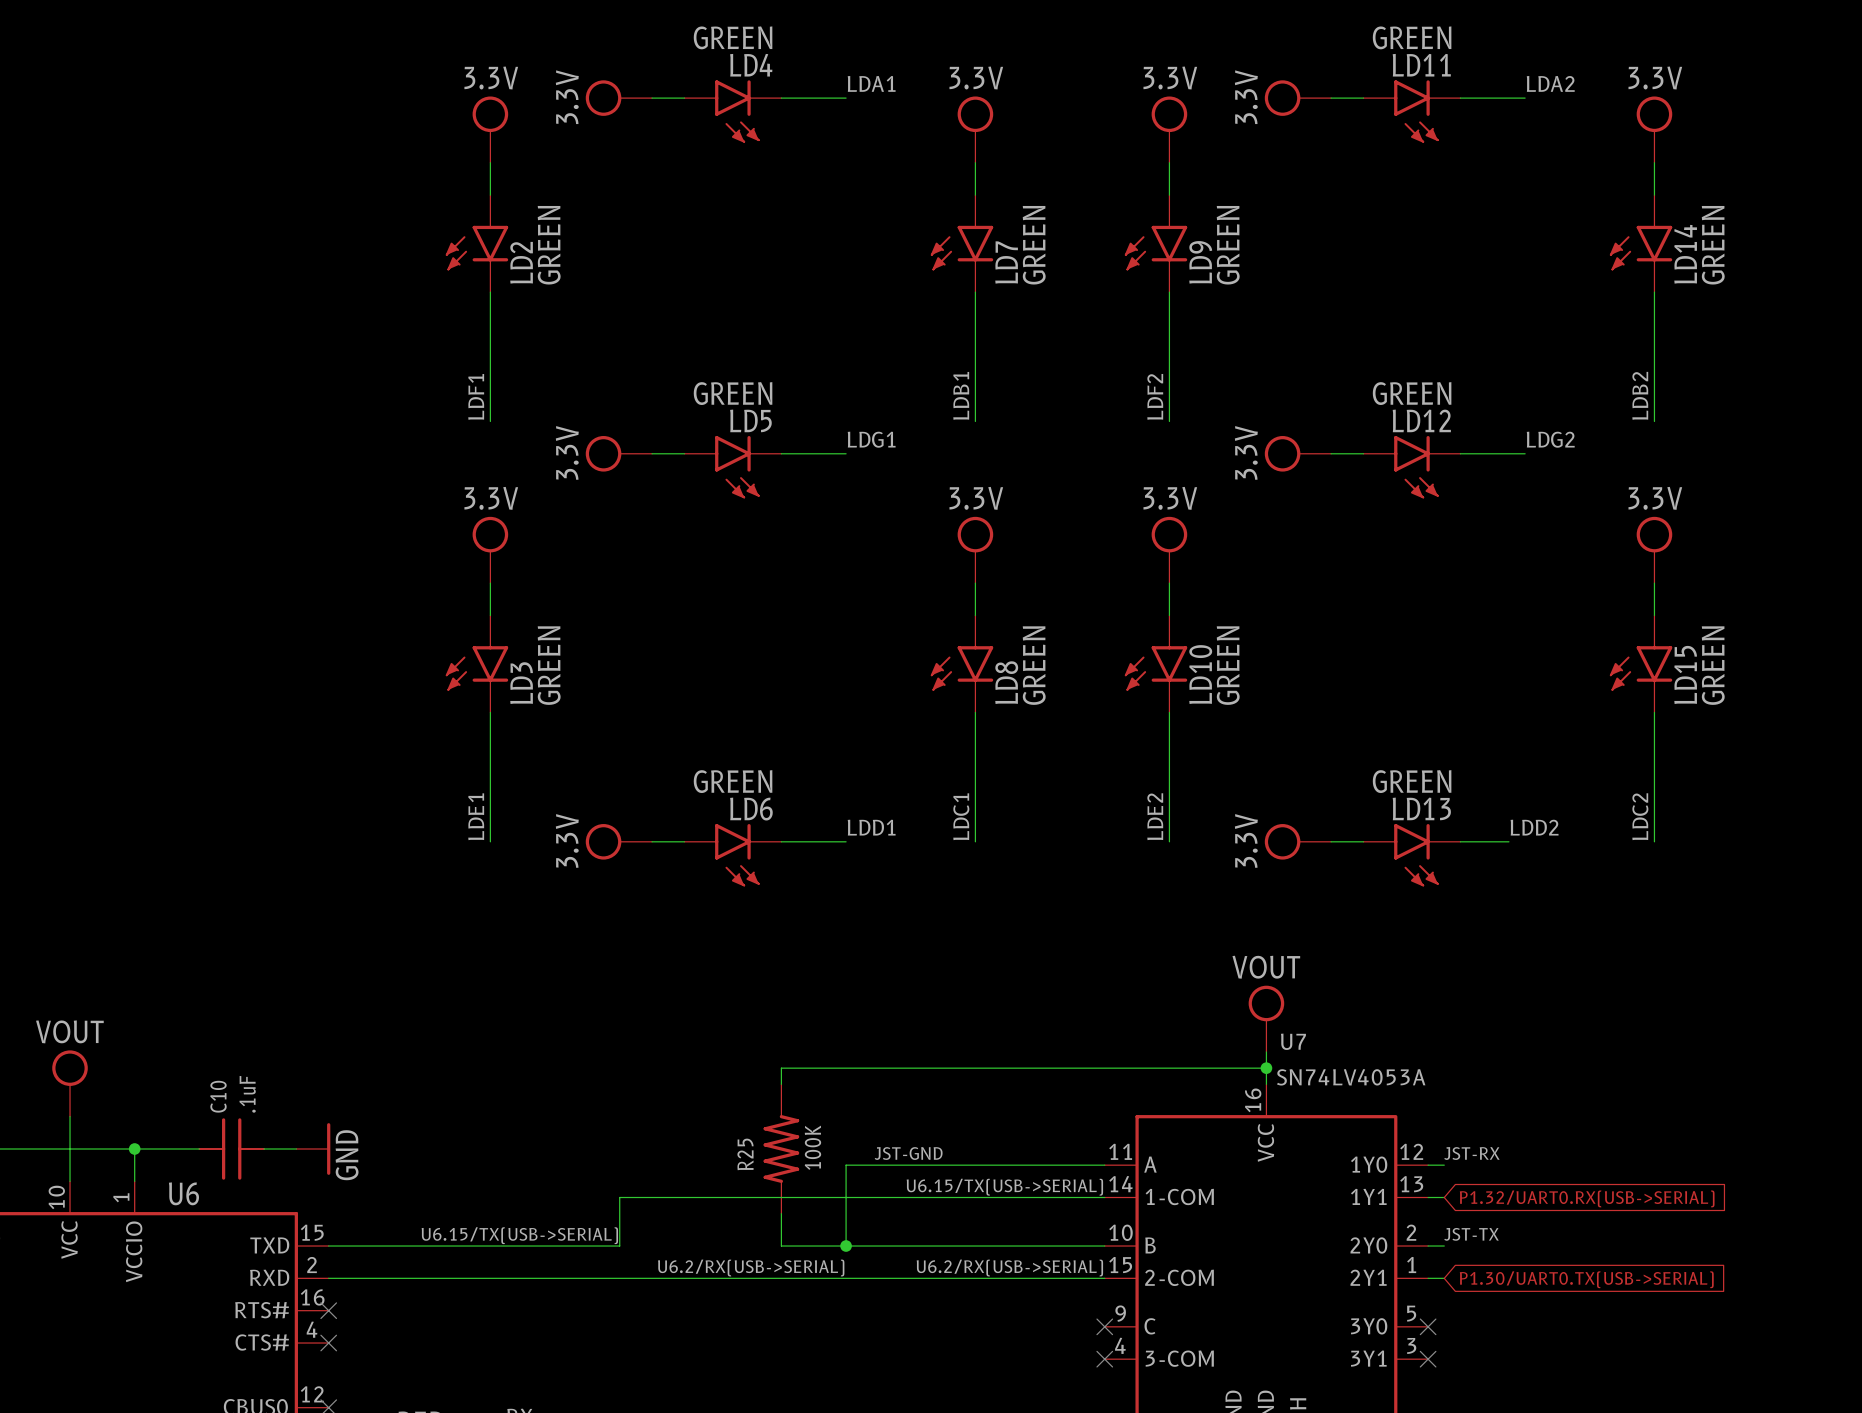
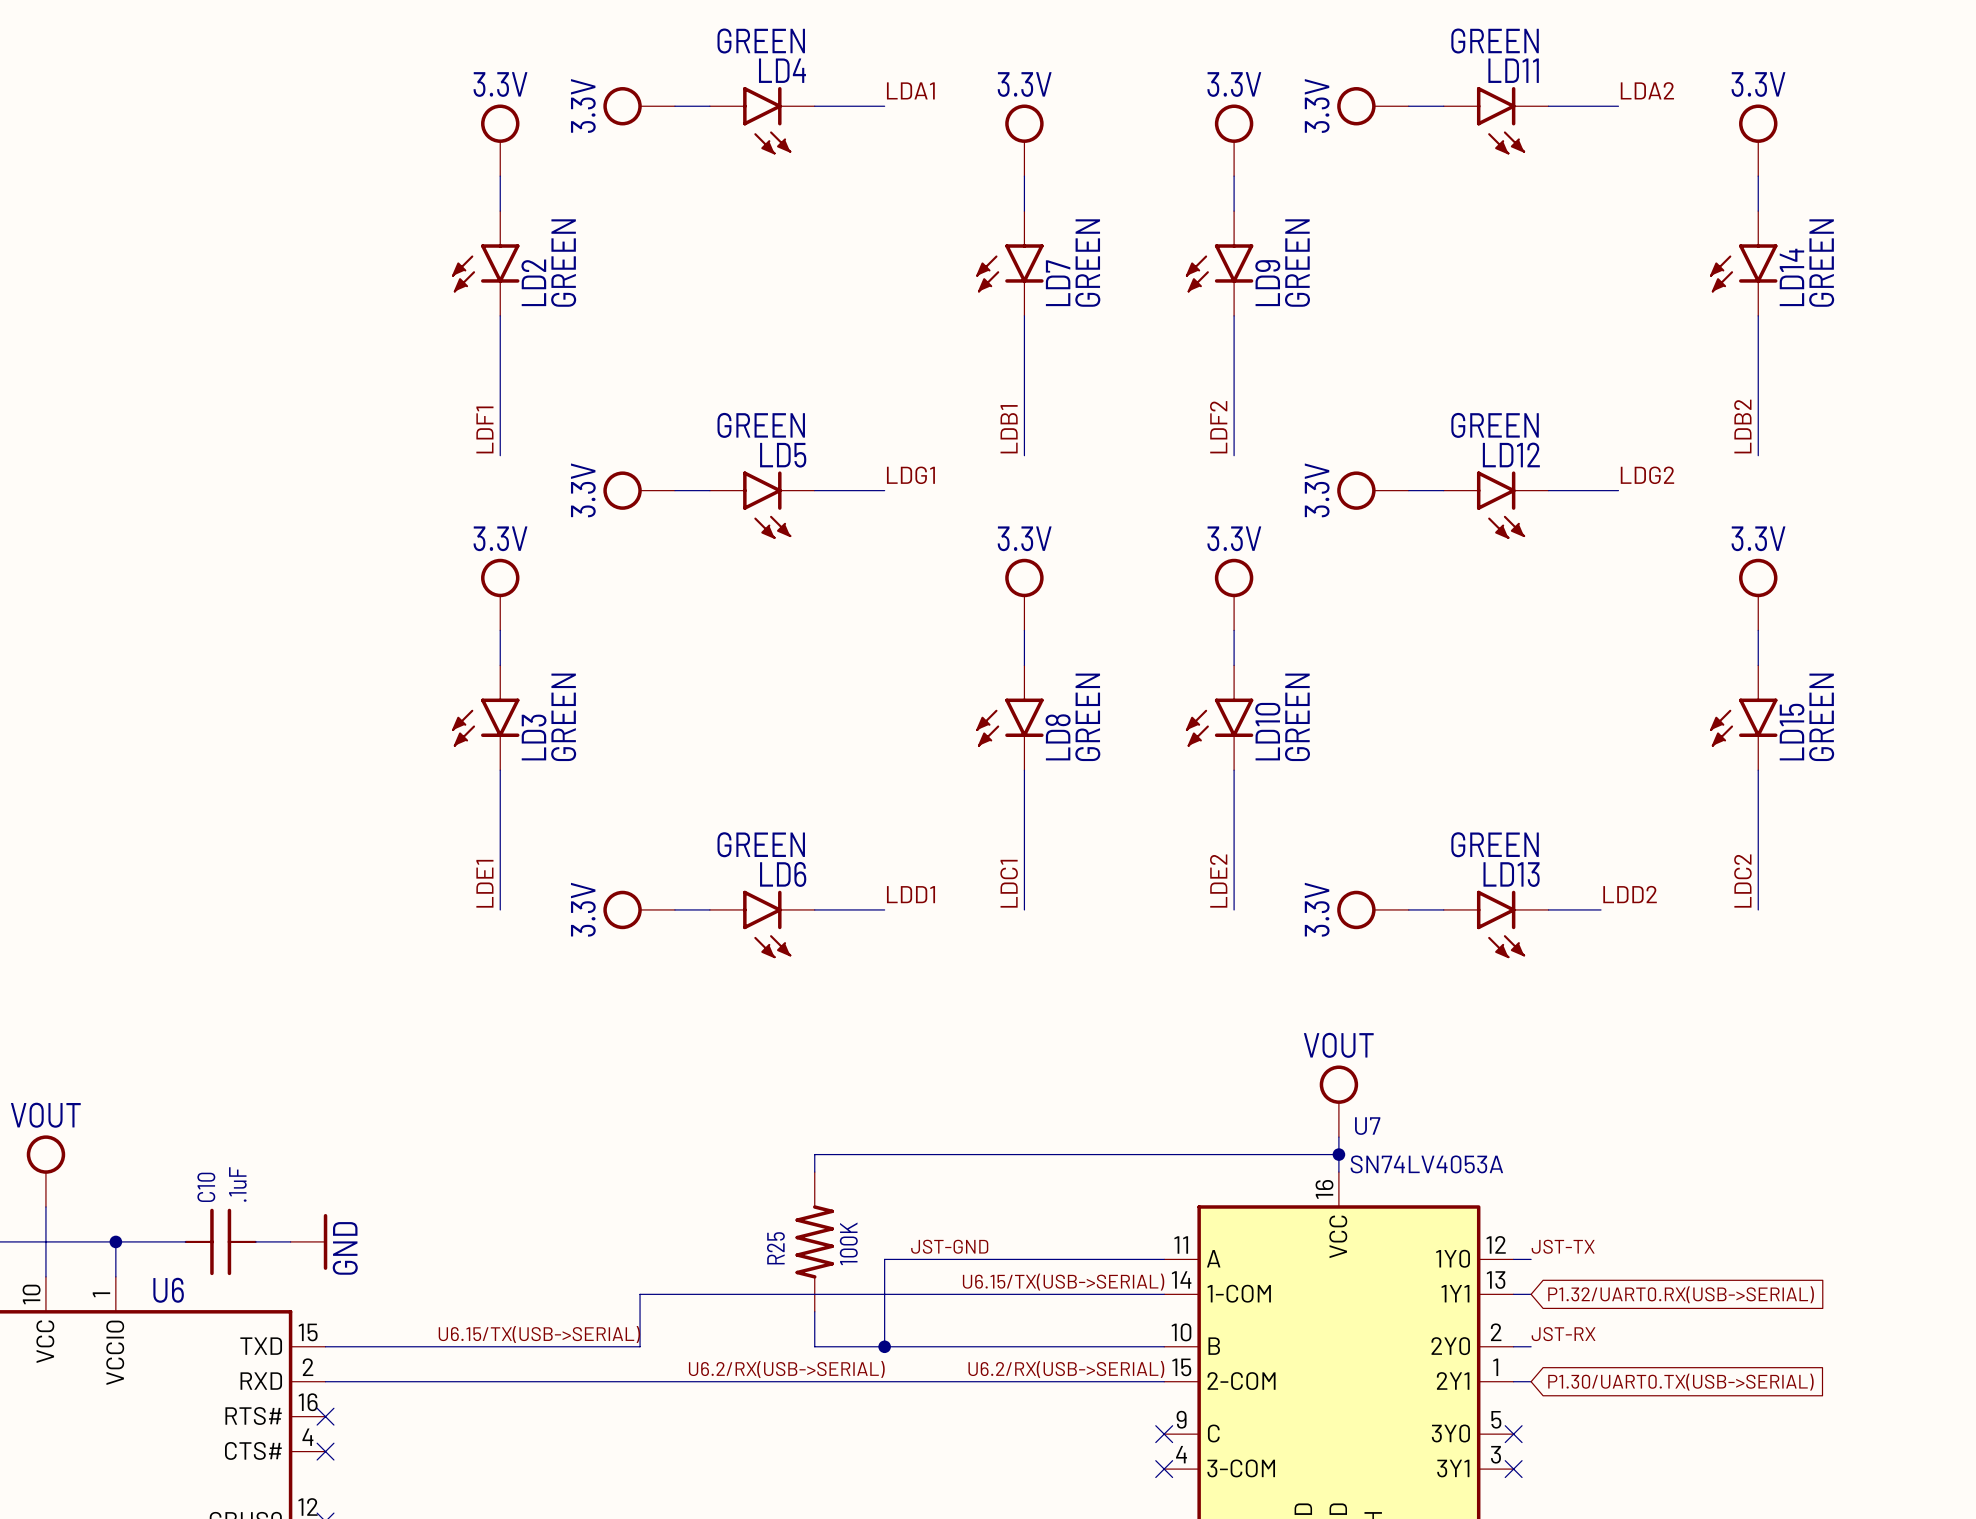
label: JST-RX (1471, 1153) -> JST-TX (1563, 1246)
label: JST-TX (1471, 1234) -> JST-RX (1563, 1334)

